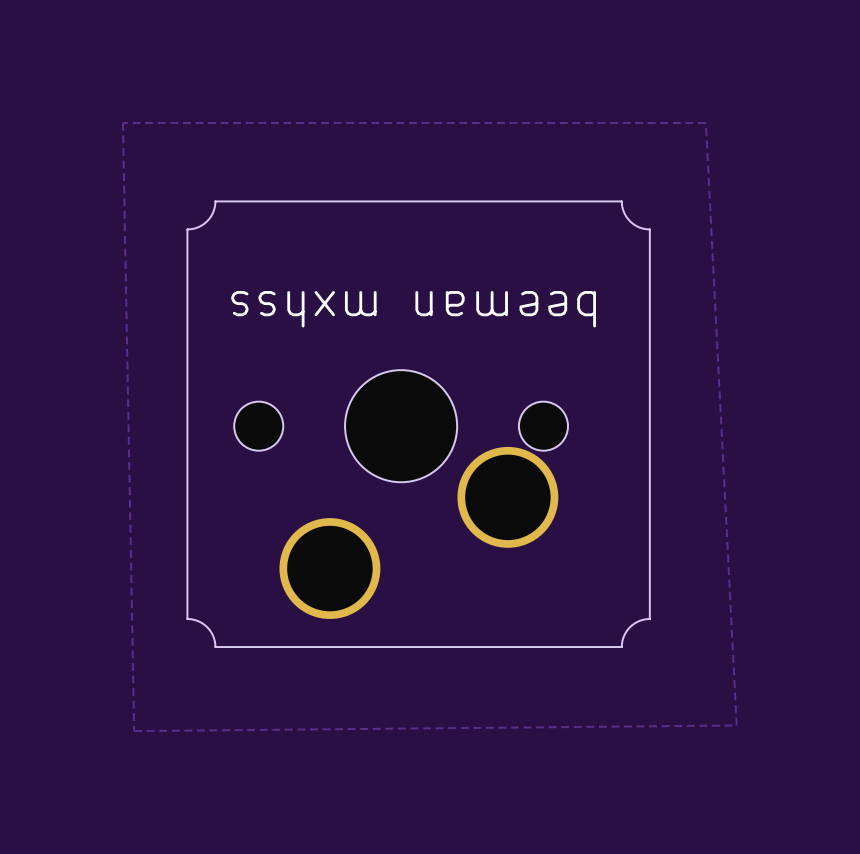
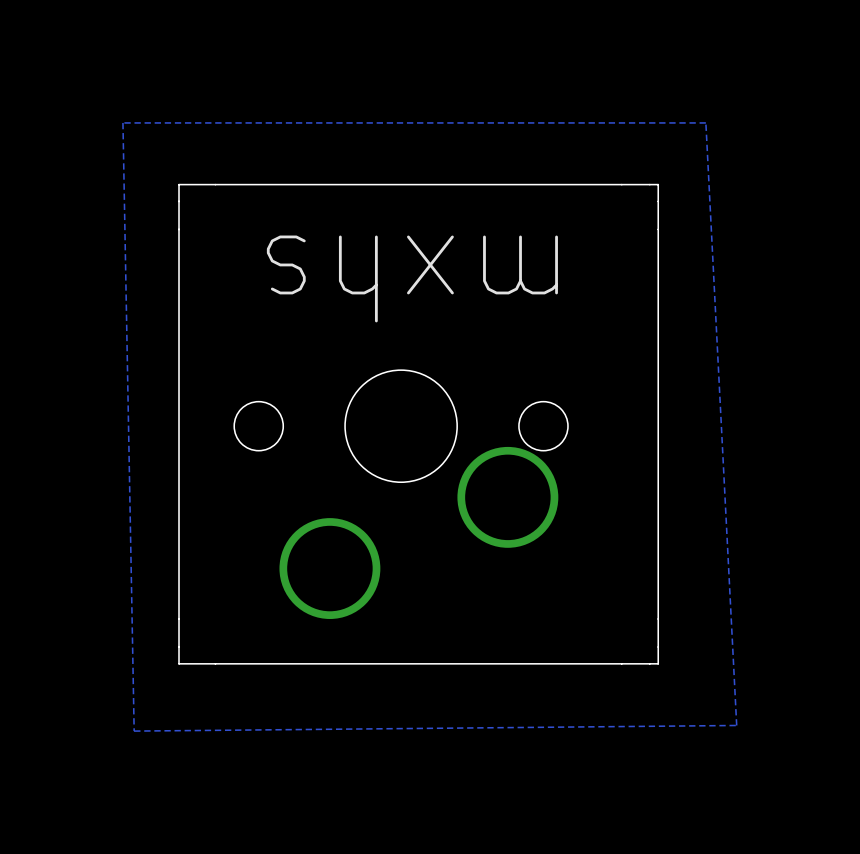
board edge: (621, 201) (215, 201) (212, 213) (207, 221) (196, 227) (187, 229) (187, 618) (196, 620) (207, 627) (213, 637) (215, 647) (621, 647) (624, 634) (630, 627) (640, 620) (649, 618) (649, 229) (637, 226) (630, 221) (624, 213) (621, 201) -> (658, 184) (658, 663) (179, 663) (179, 184) (658, 184)
text: none -> mxhs (412, 278)
text: beeman mxhss (413, 309) -> none

